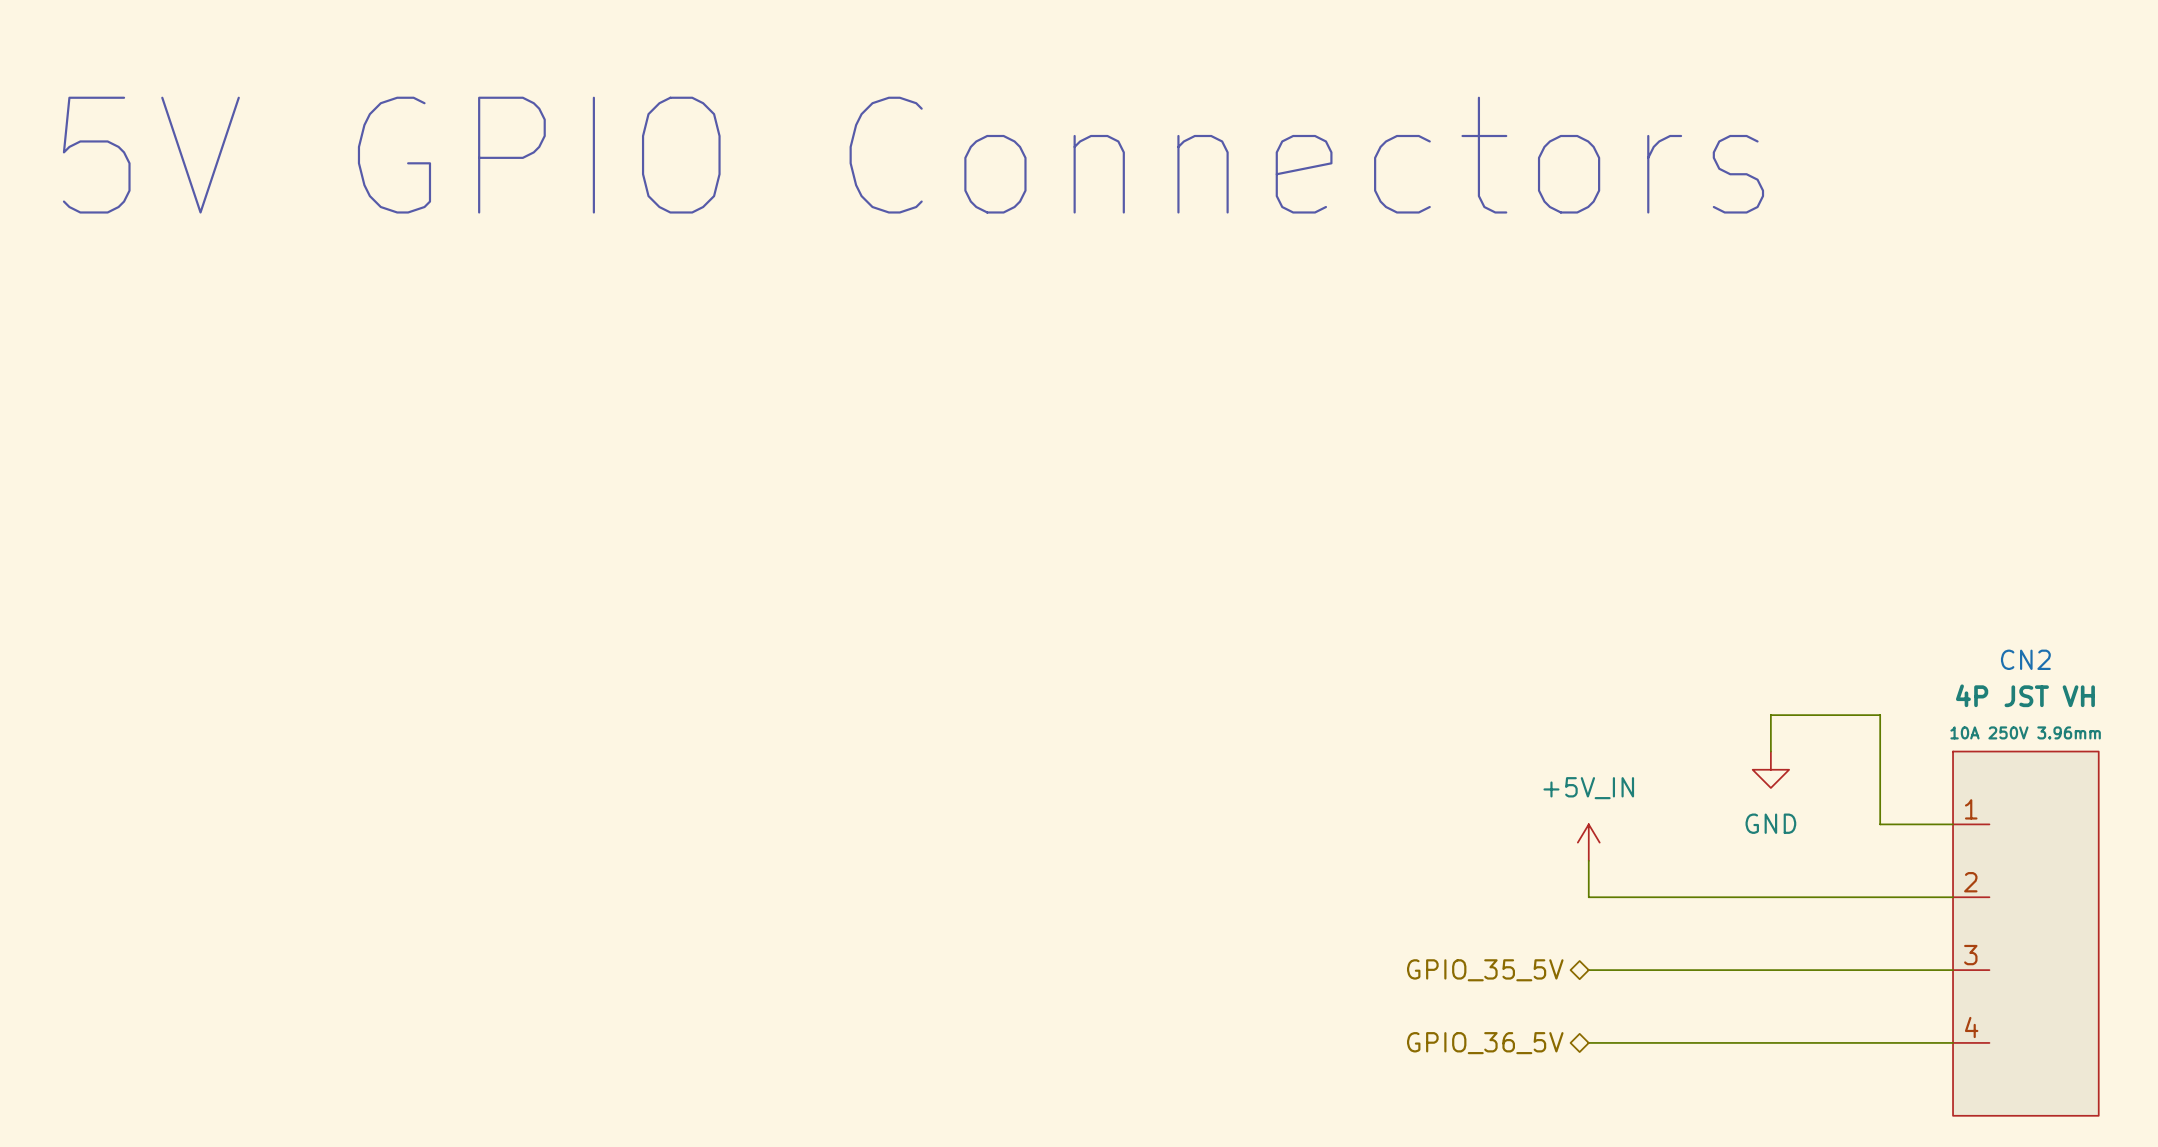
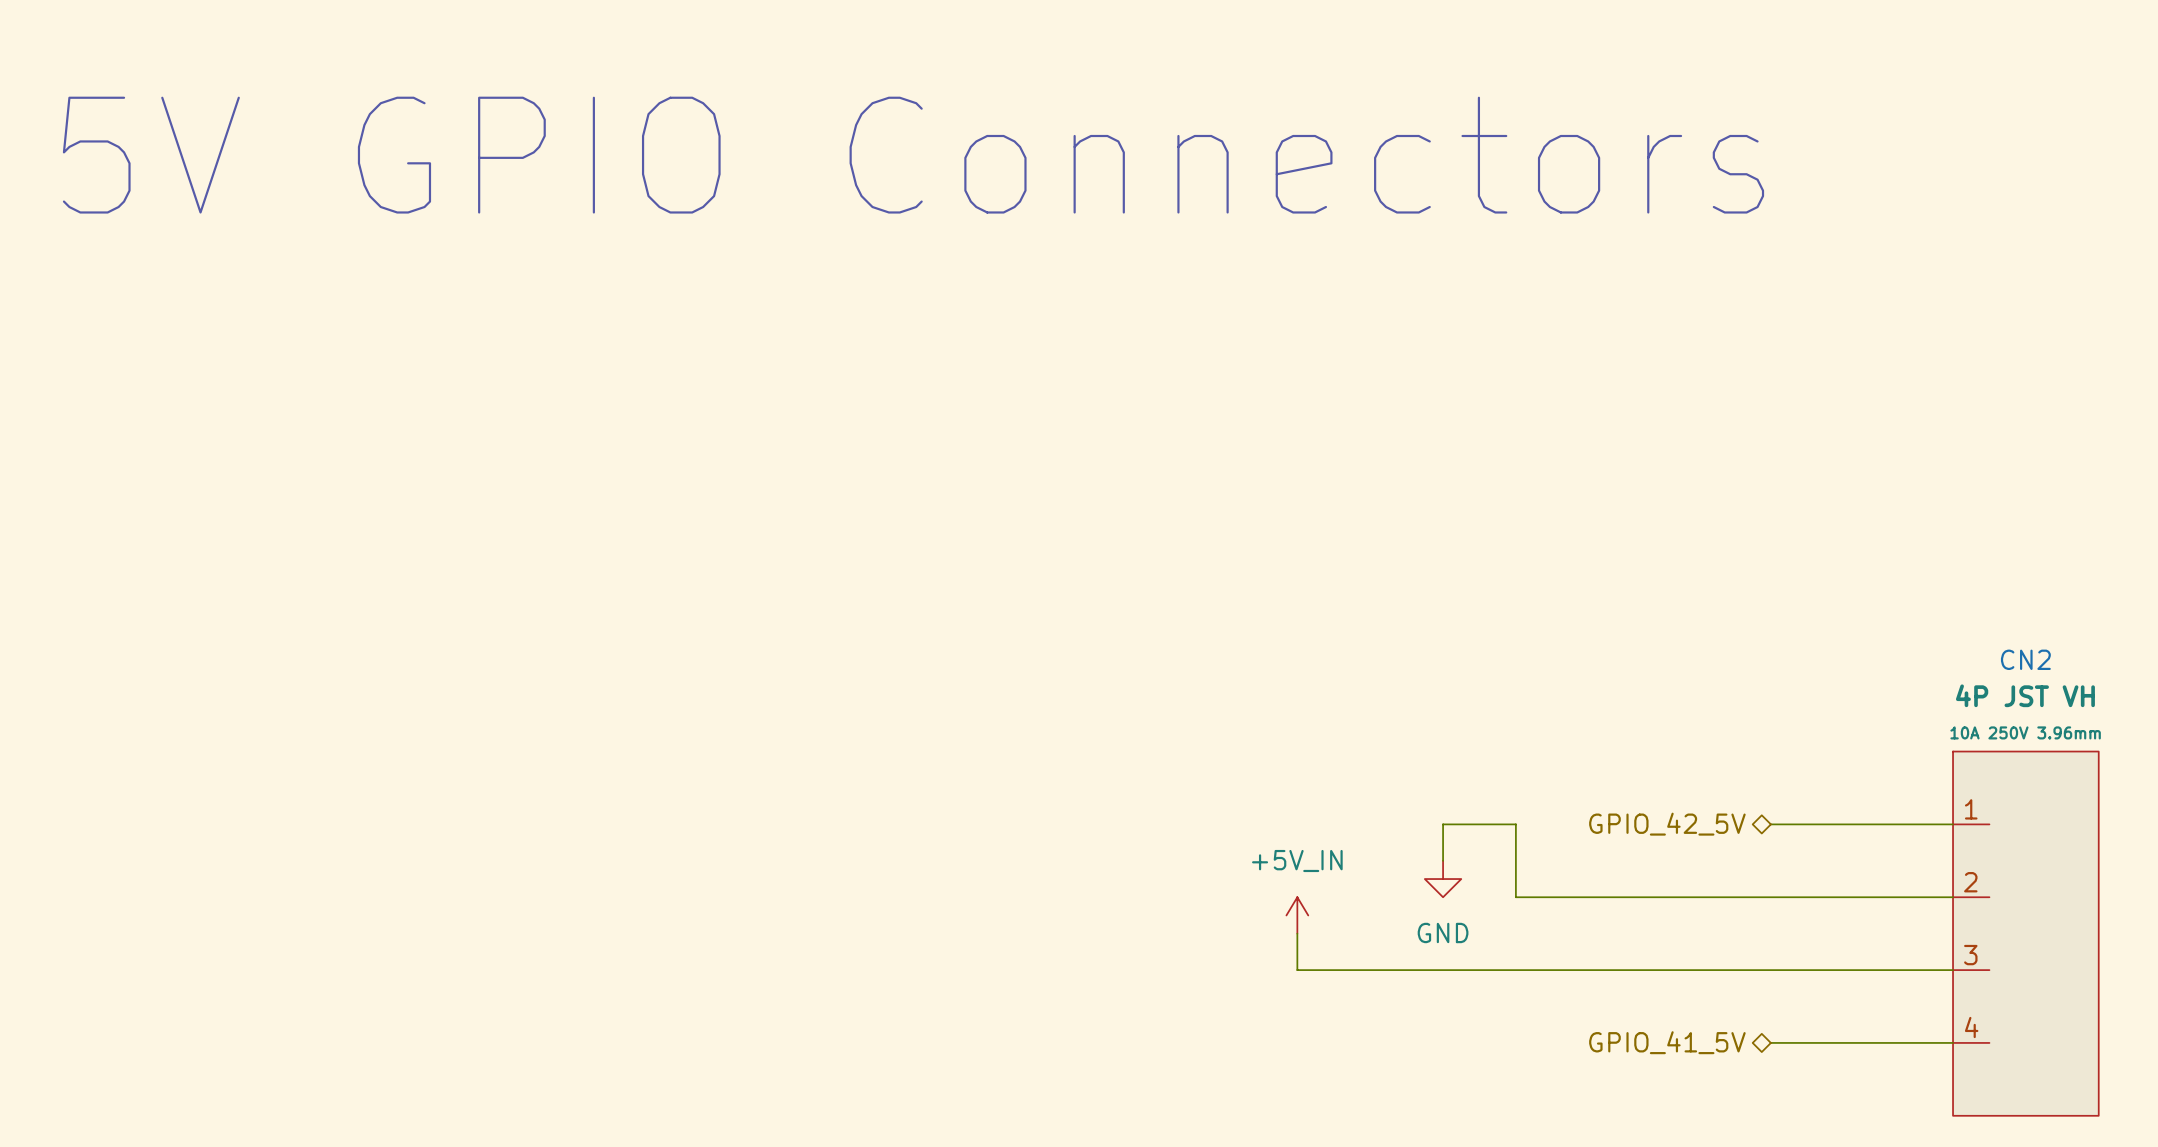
wire: (1770, 751) (1770, 715) (1880, 715) (1880, 824) -> (1770, 824) (1880, 824)
power symbol position: GND (1770, 769) -> GND (1443, 879)
hierarchical label: none -> GPIO_42_5V (1667, 824)
power symbol position: +5V_IN (1588, 842) -> +5V_IN (1297, 915)
wire: (1588, 860) (1588, 897) -> (1443, 860) (1443, 824) (1515, 824) (1515, 897) (1588, 897)
wire: none -> (1297, 933) (1297, 970) (1588, 970)
hierarchical label: GPIO_35_5V (1485, 970) -> none
wire: (1588, 1042) (1770, 1042) -> none
hierarchical label: GPIO_36_5V (1485, 1043) -> GPIO_41_5V (1667, 1042)

